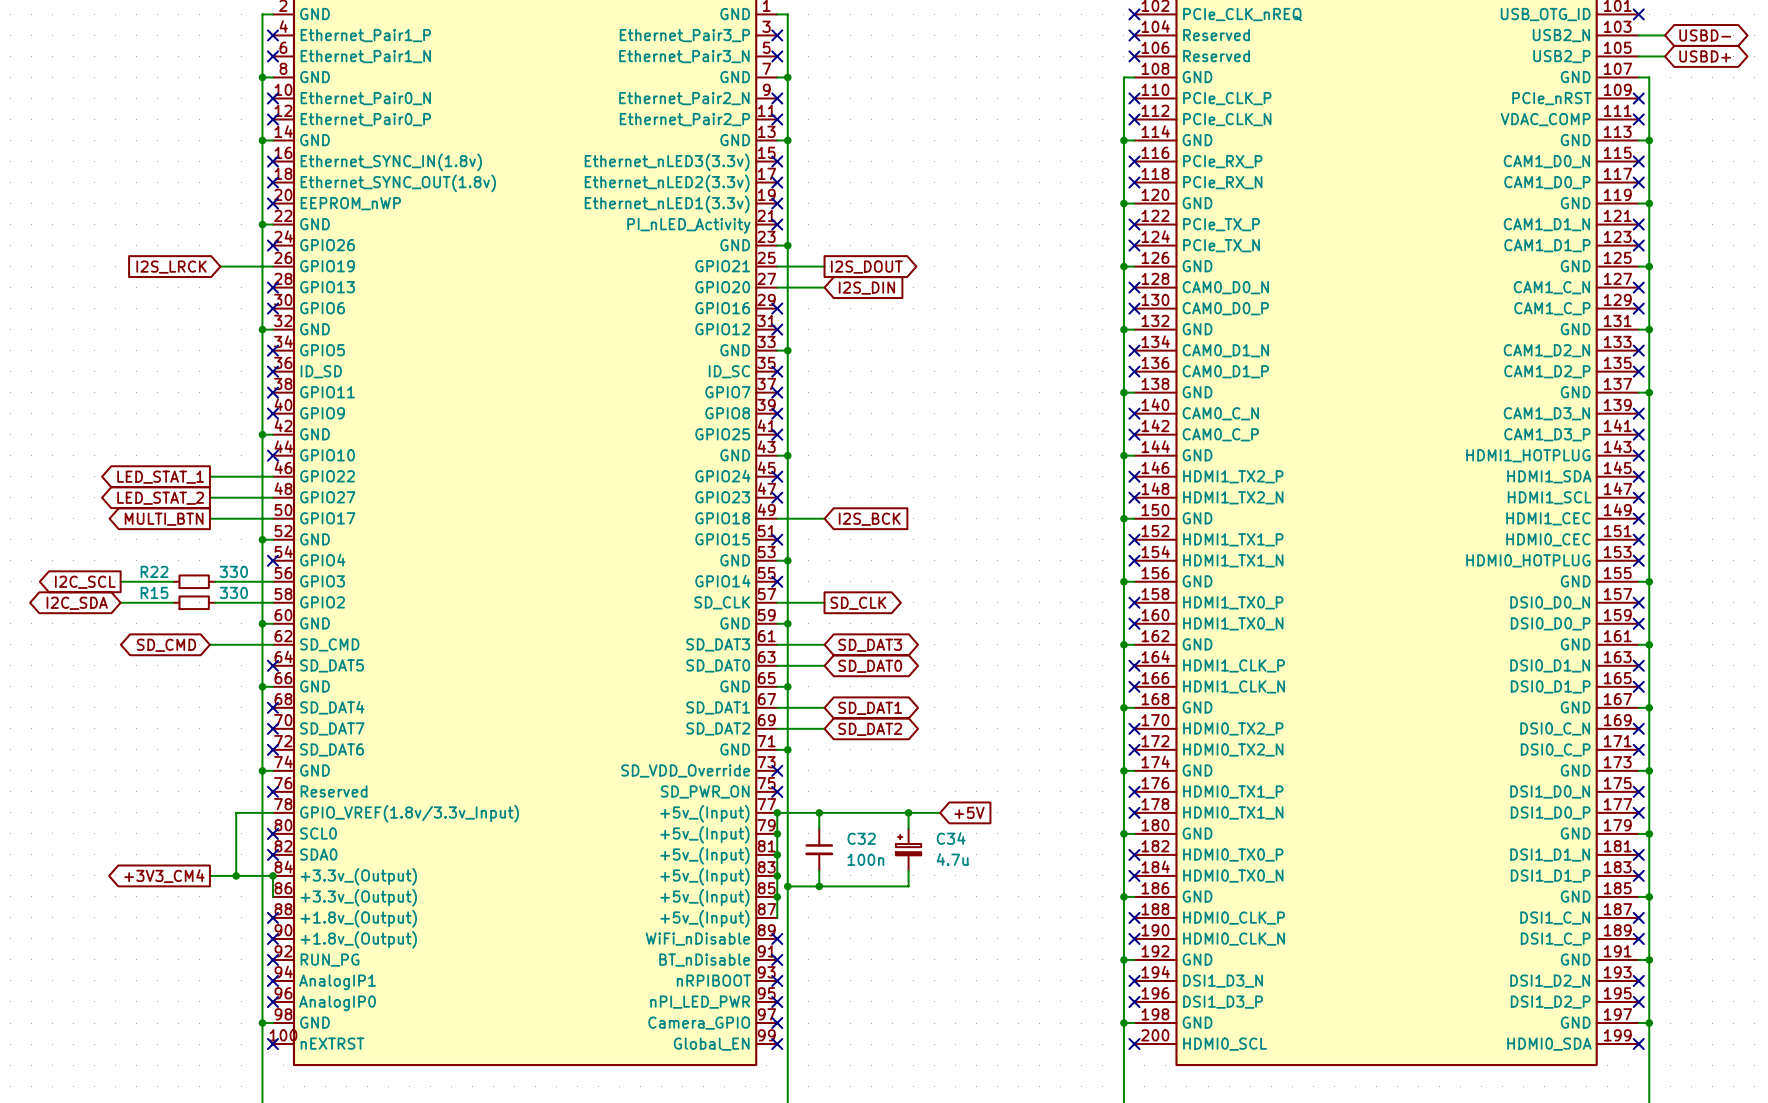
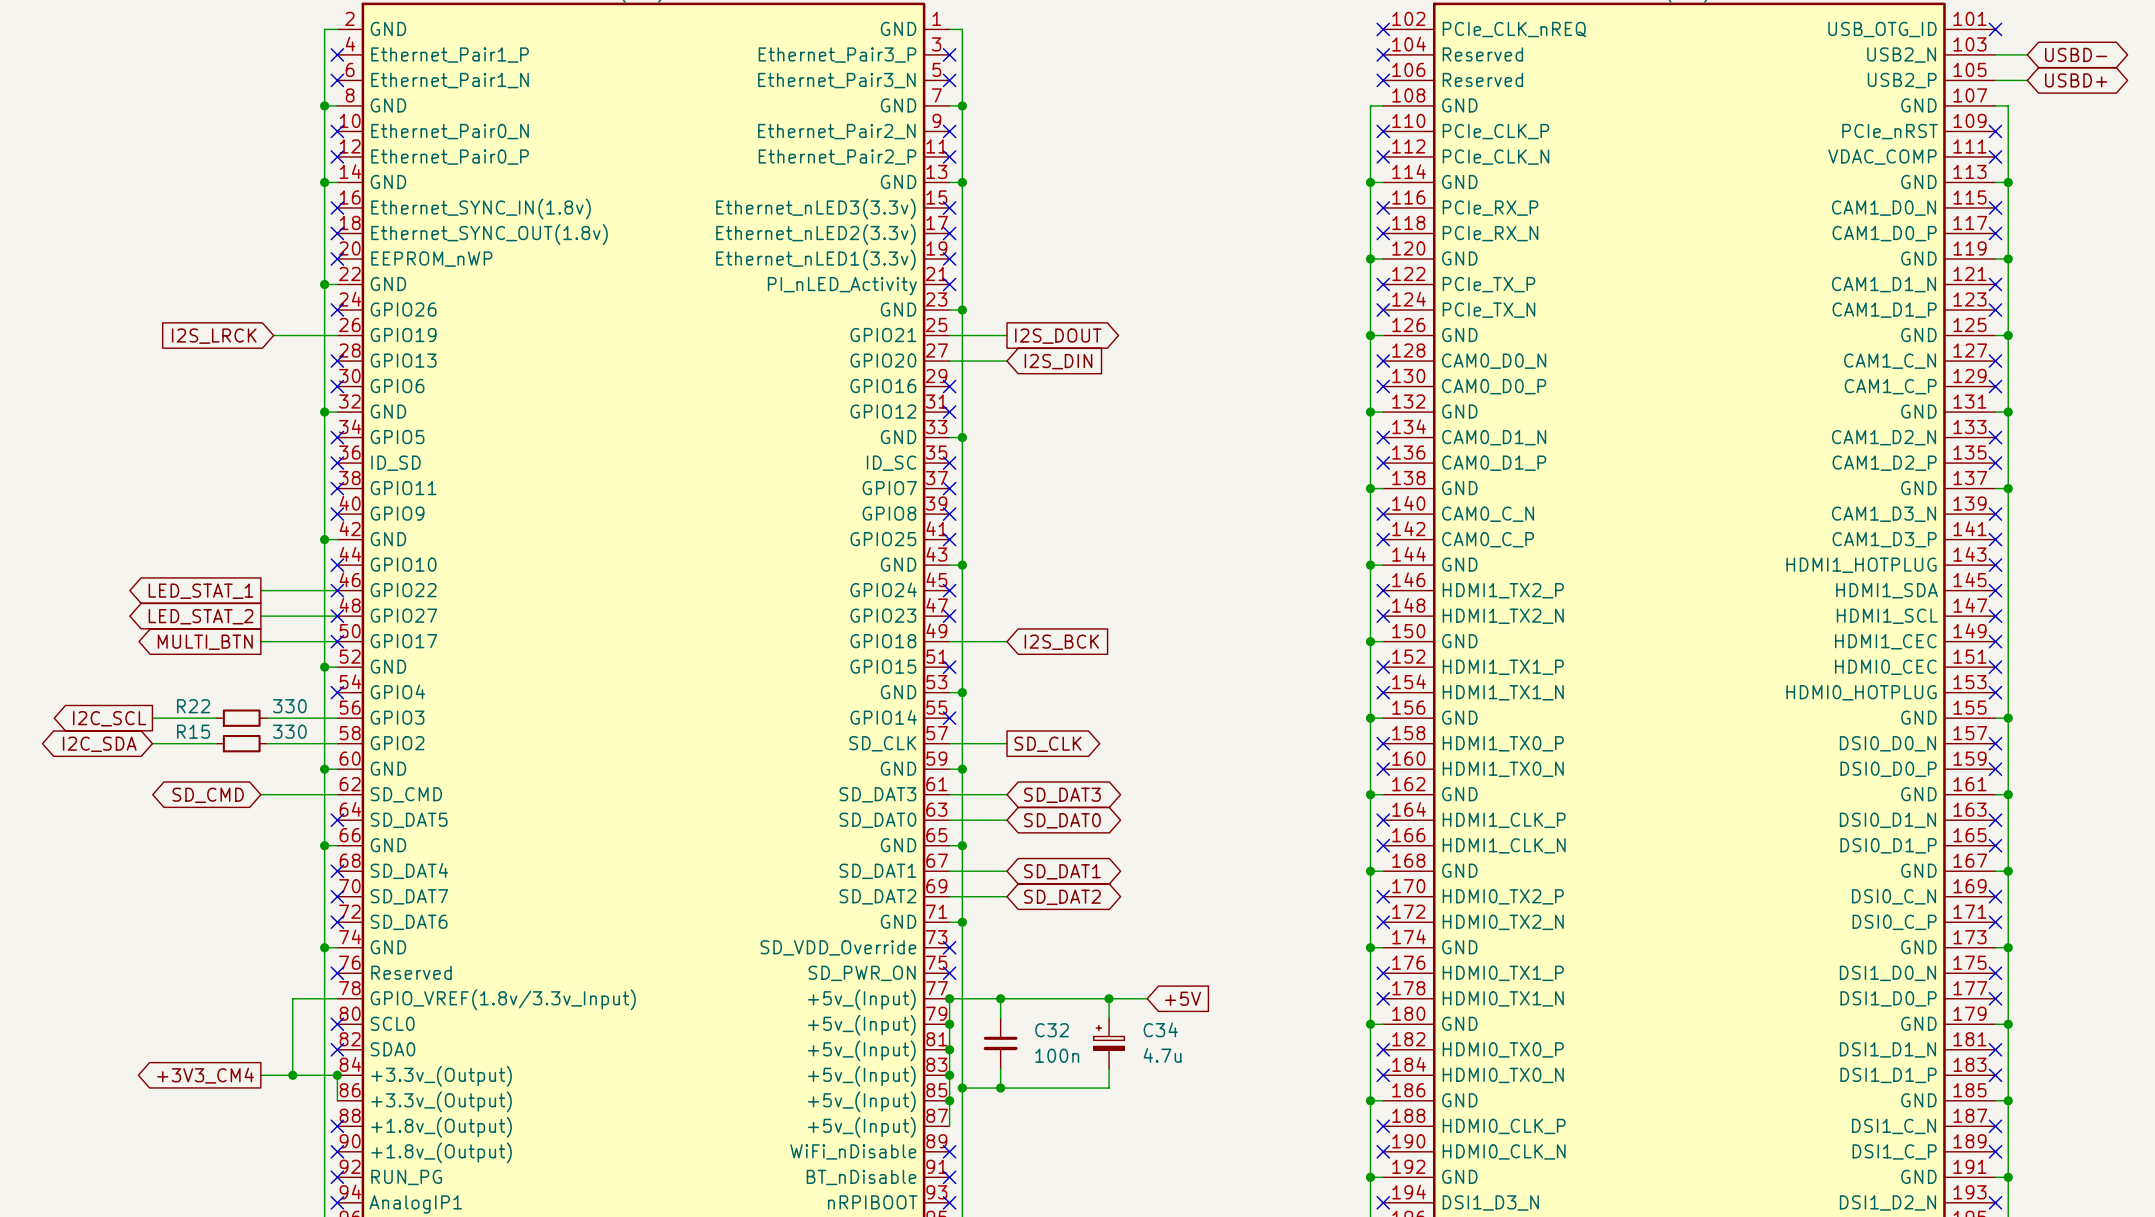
no-connect mark: none -> (337, 590)
no-connect mark: none -> (337, 616)
no-connect mark: none -> (337, 641)

